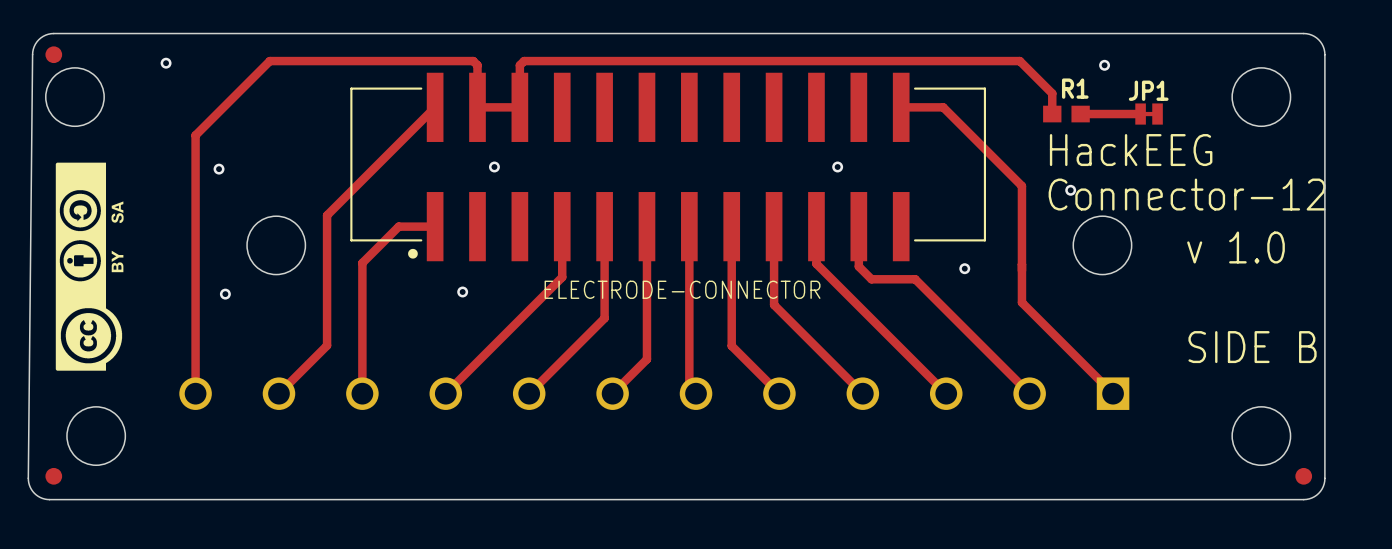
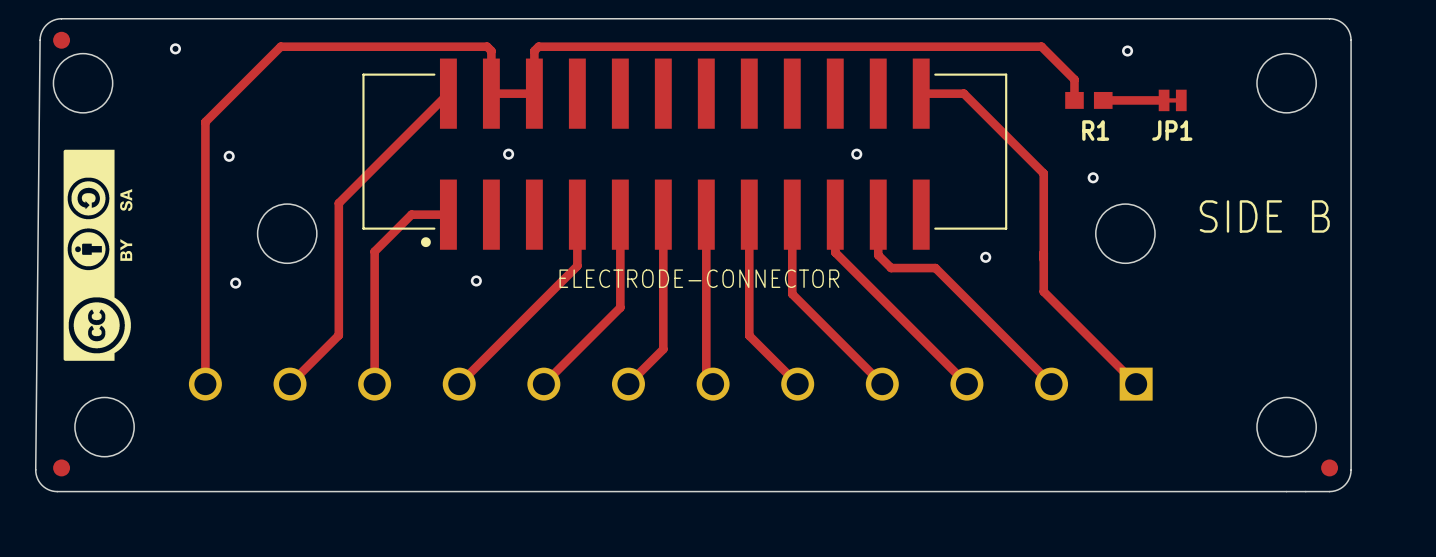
R1 name position: R1 (1075, 88) -> R1 (1095, 130)
JP1 name position: JP1 (1148, 90) -> JP1 (1172, 130)
text: HackEEG (1131, 150) -> none
text: Connector-12 (1187, 194) -> none
text: v 1.0 (1236, 247) -> none
text position: SIDE B (1252, 347) -> SIDE B (1264, 216)

